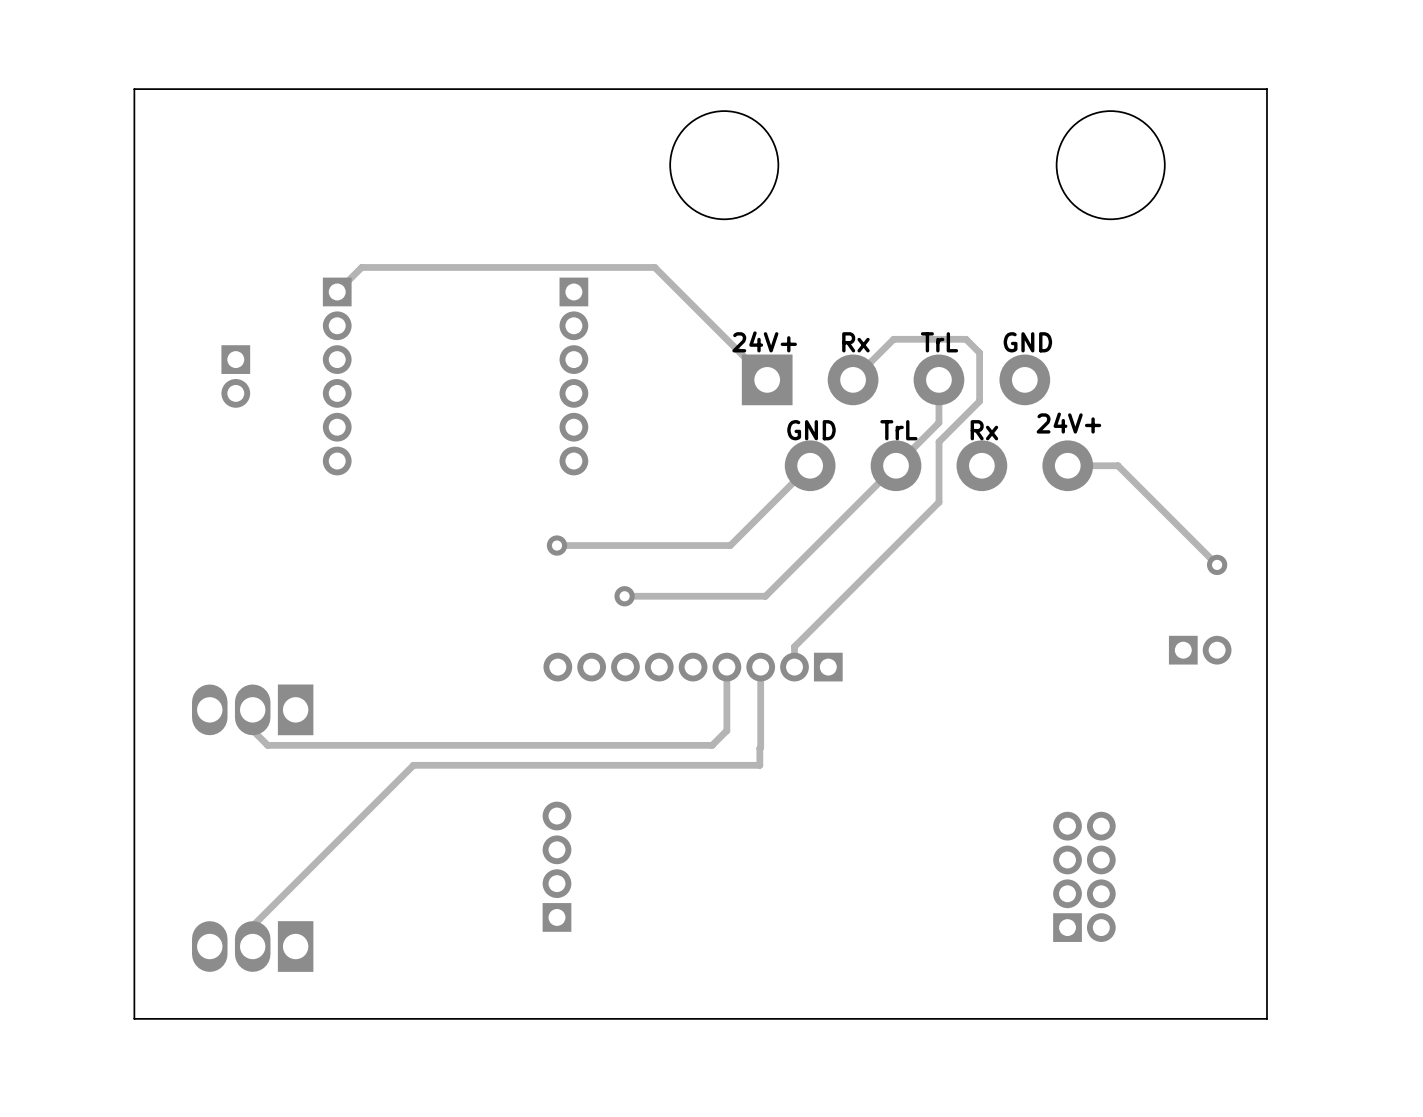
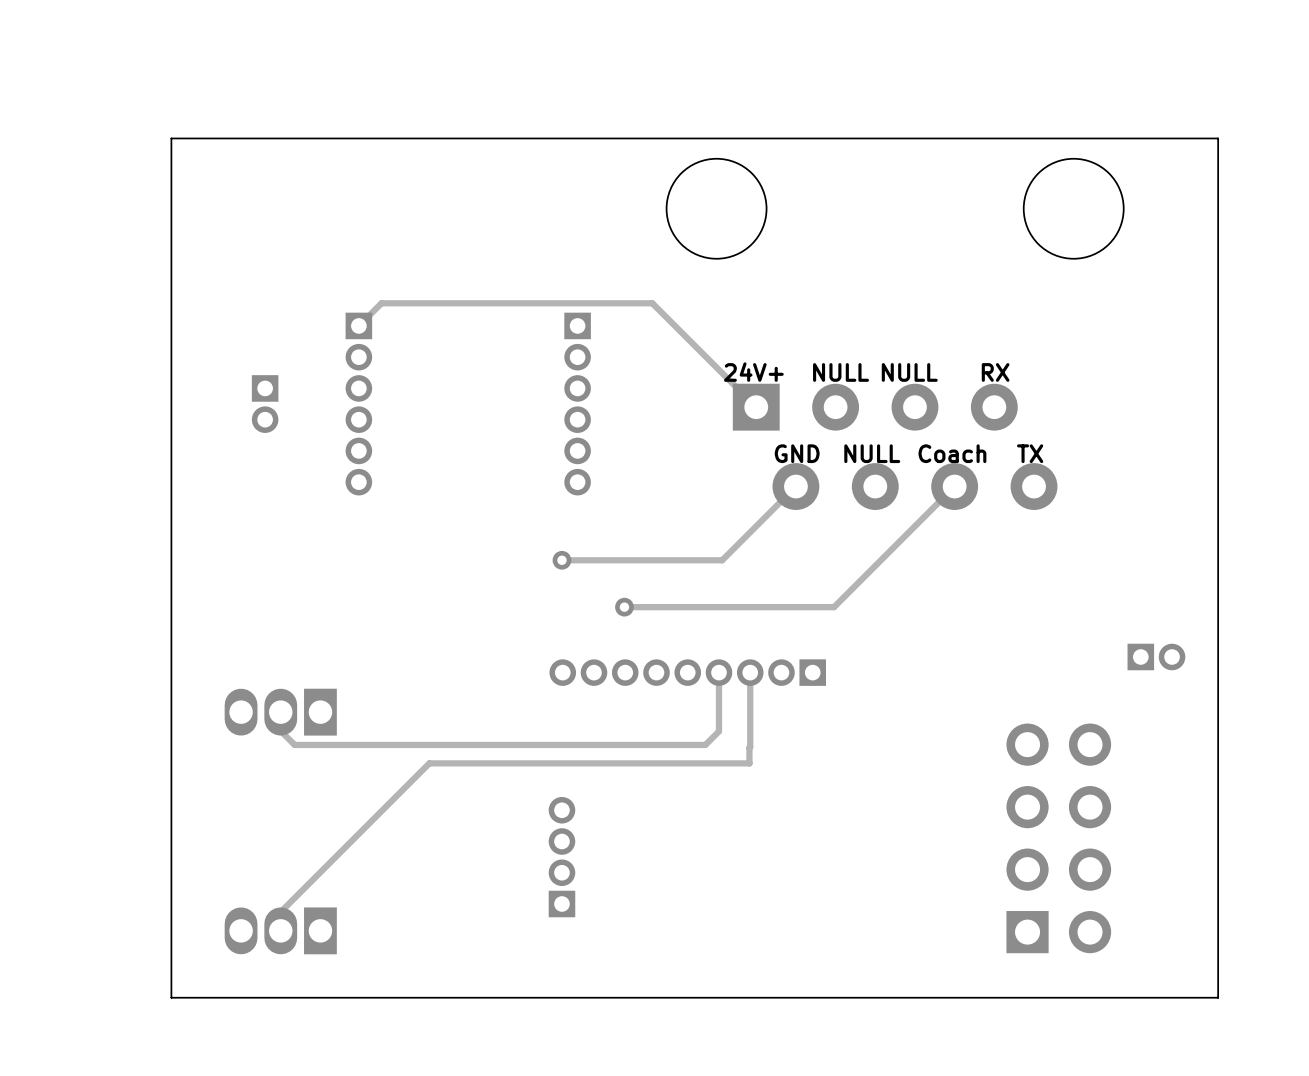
text: Rx (855, 342) -> NULL (841, 372)
text: TrL (939, 342) -> NULL (909, 372)
text: GND (1027, 342) -> RX (995, 372)
track: (853, 379) (893, 339) (966, 339) (979, 352) (979, 401) (939, 441) (939, 502) (794, 646) (794, 667) -> none
track: (938, 379) (938, 422) (765, 596) -> (954, 486) (834, 607) (754, 607)
text: 24V+ (1068, 423) -> TX (1030, 453)
text: TrL (898, 430) -> NULL (872, 453)
text: Rx (984, 430) -> Coach (952, 453)
track: (1067, 465) (1117, 465) (1217, 564) -> none
via: (1217, 564) -> none
part footprint: [1053, 811, 1116, 942] -> [1006, 723, 1112, 954]

